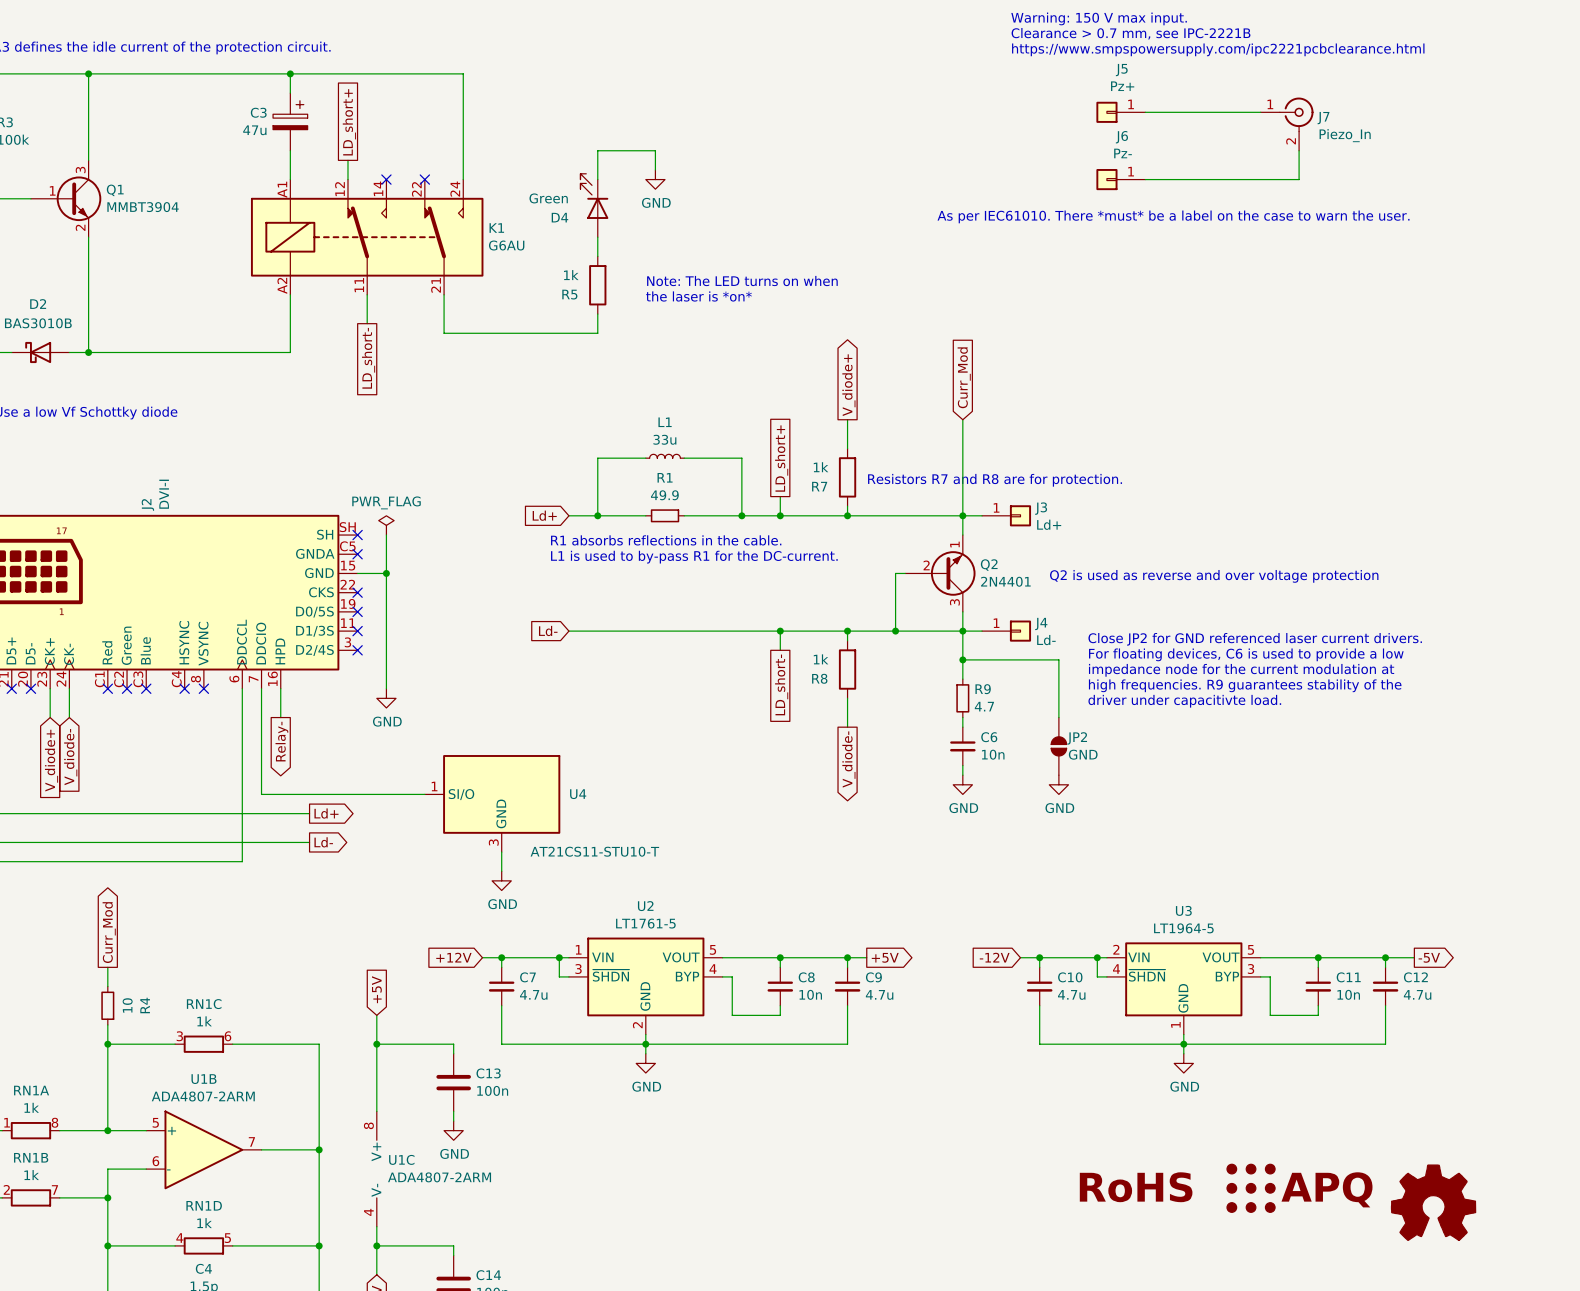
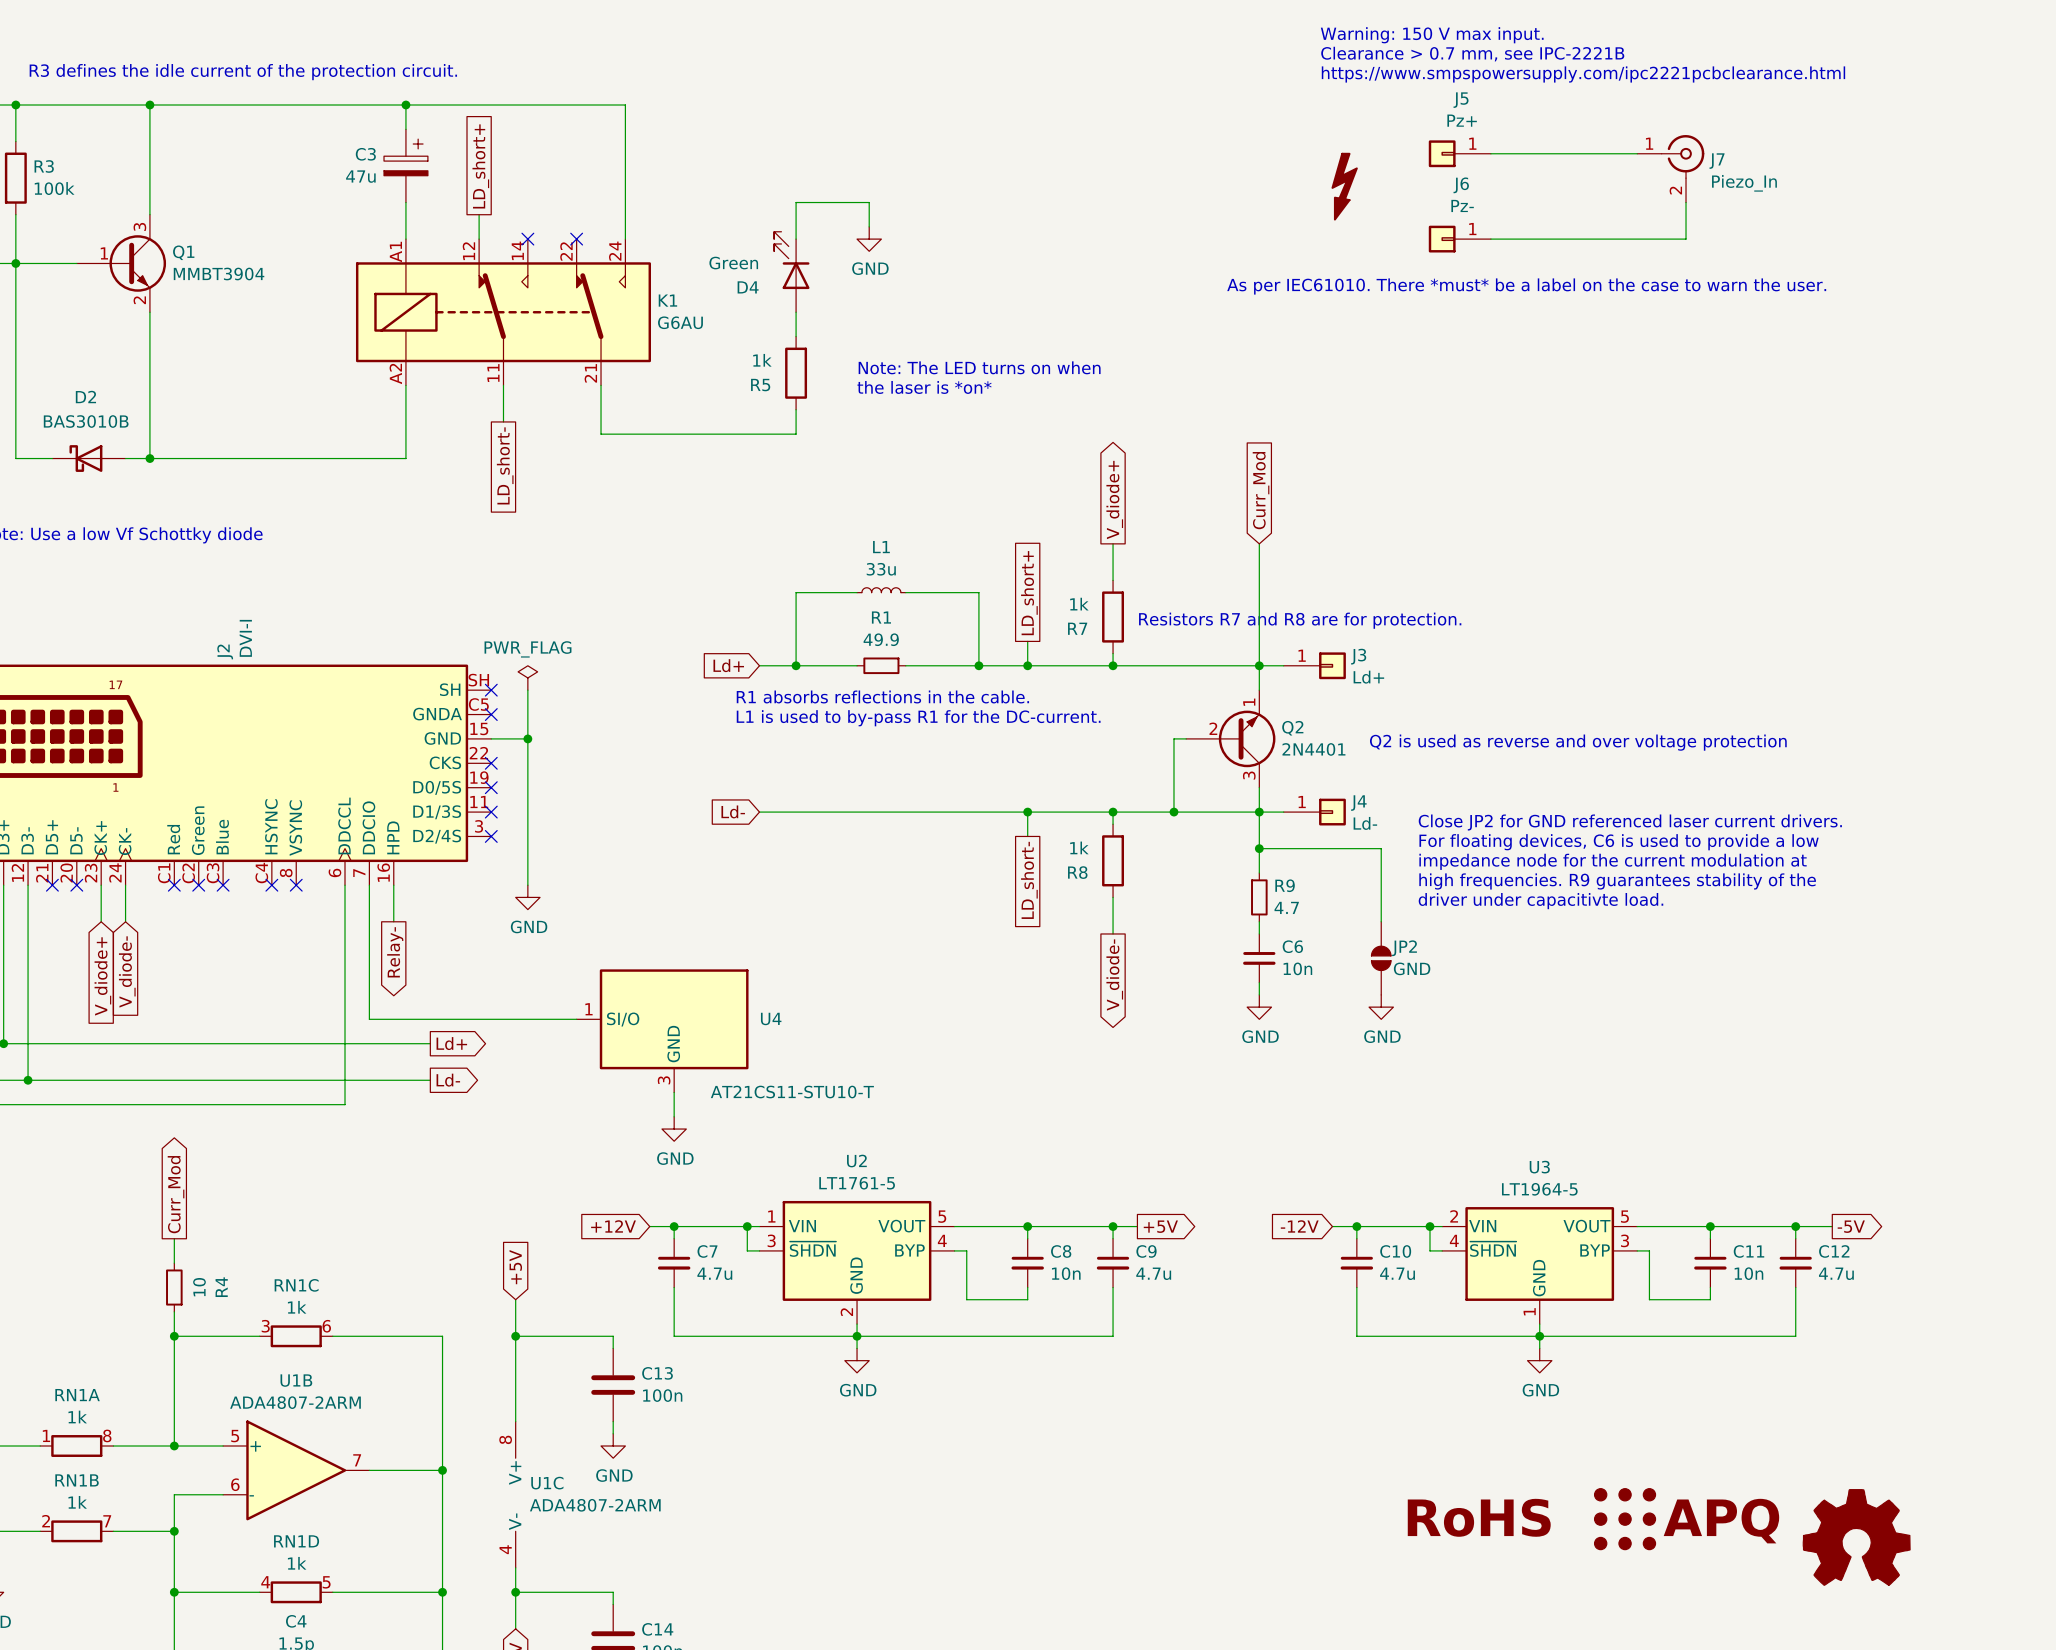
part: none -> (1344, 186)

